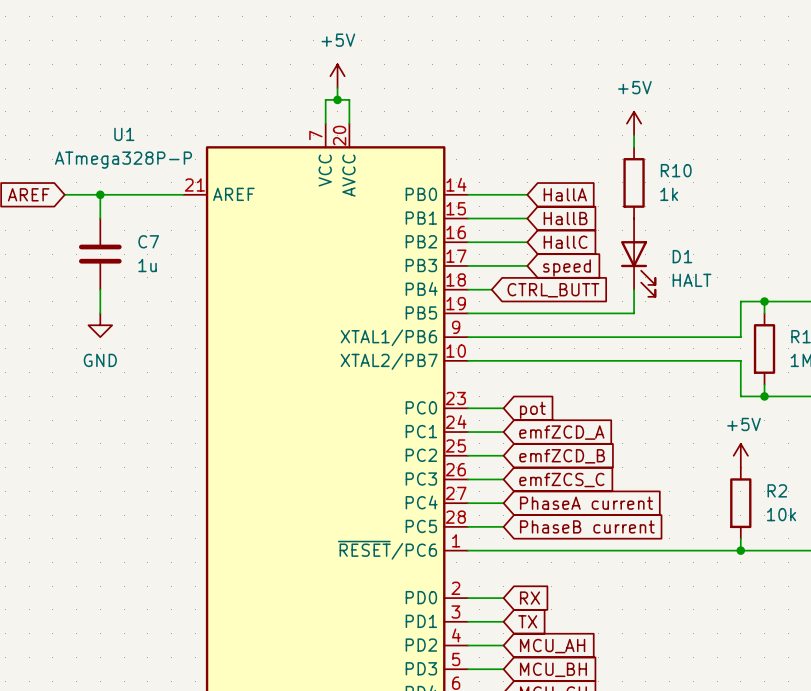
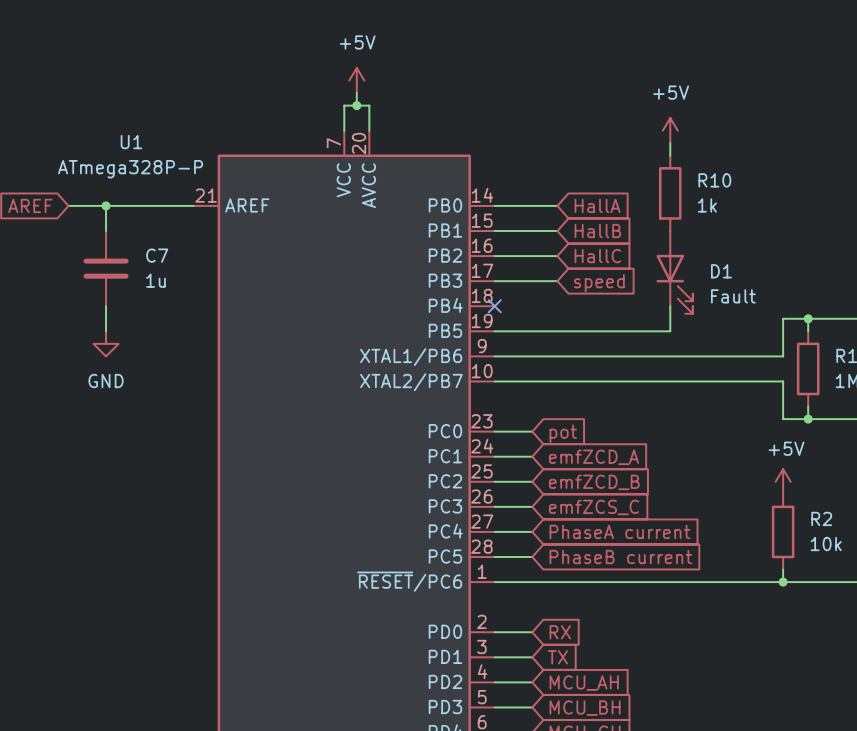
D1 value: HALT (692, 280) -> Fault (733, 296)
wire: (468, 289) (491, 289) -> none
no-connect mark: none -> (494, 306)
global label: CTRL_BUTT (553, 290) -> none

